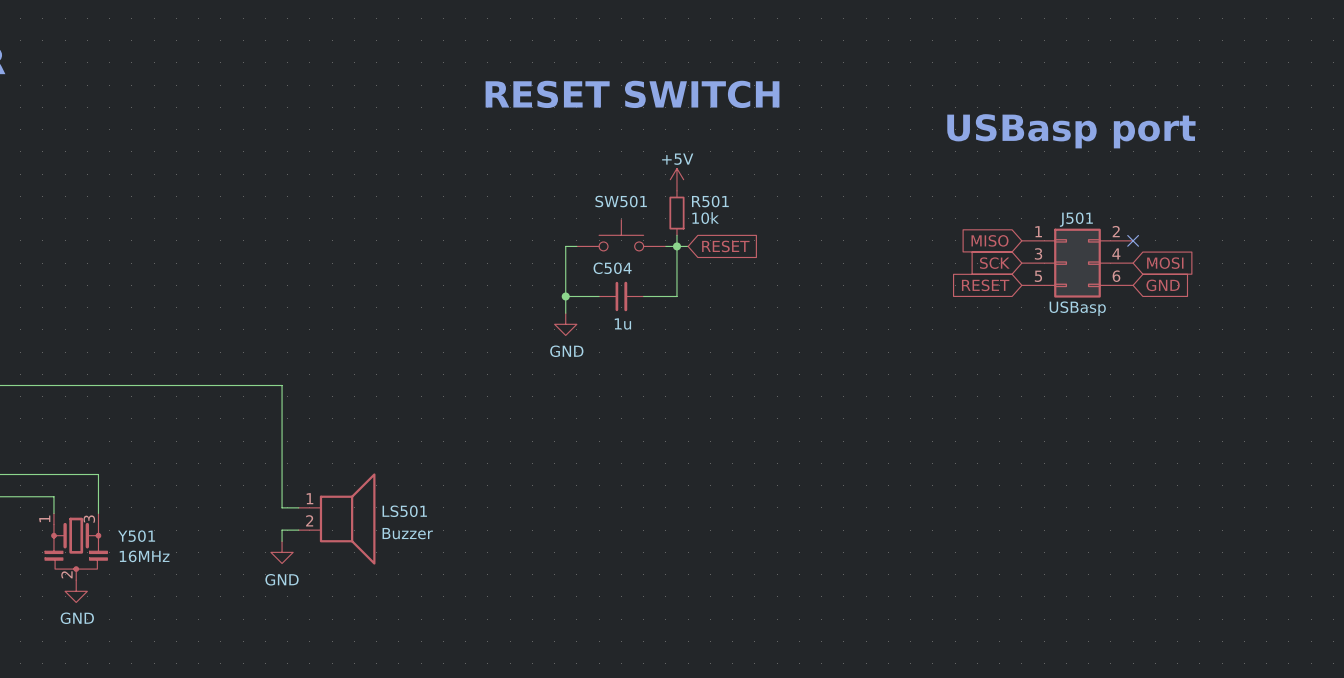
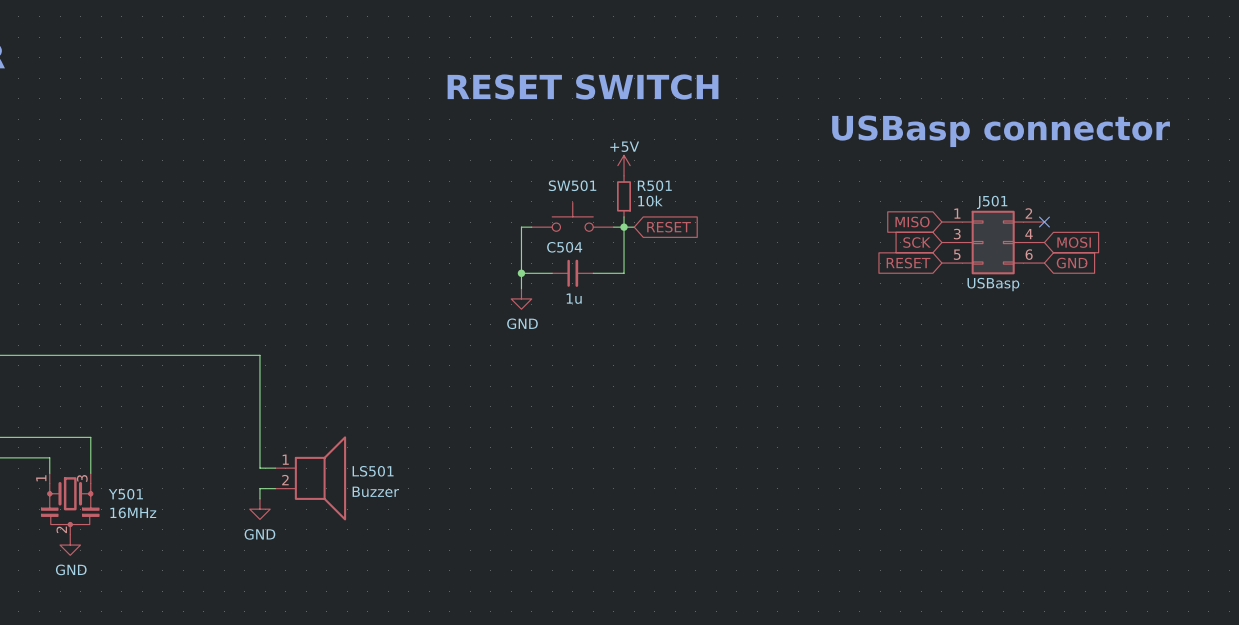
text: USBasp port (1071, 131) -> USBasp connector (1001, 131)

